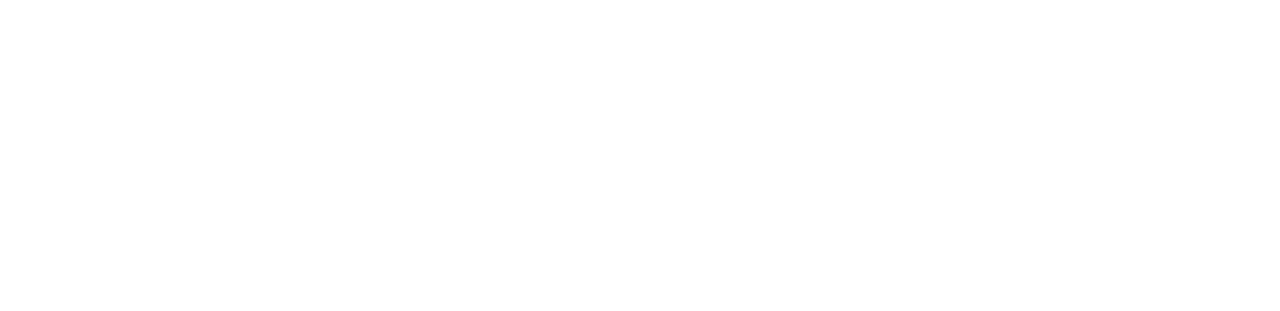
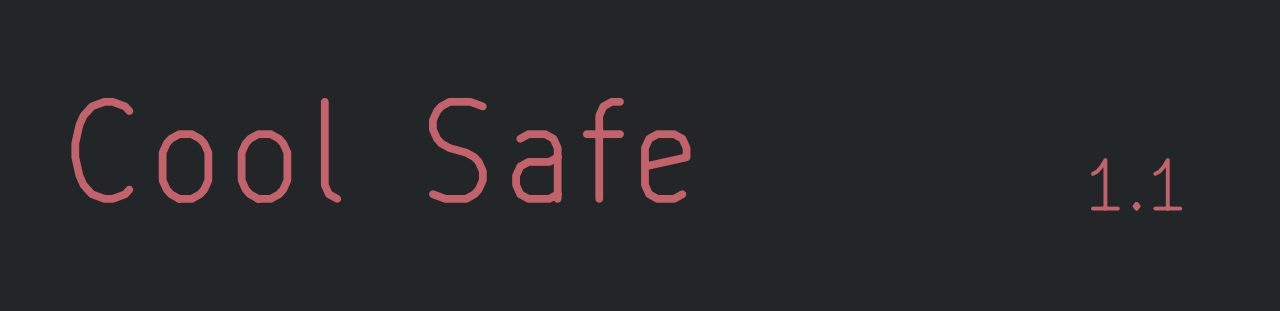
text: none -> Cool Safe (380, 150)
text: none -> 1.1 (1136, 184)

